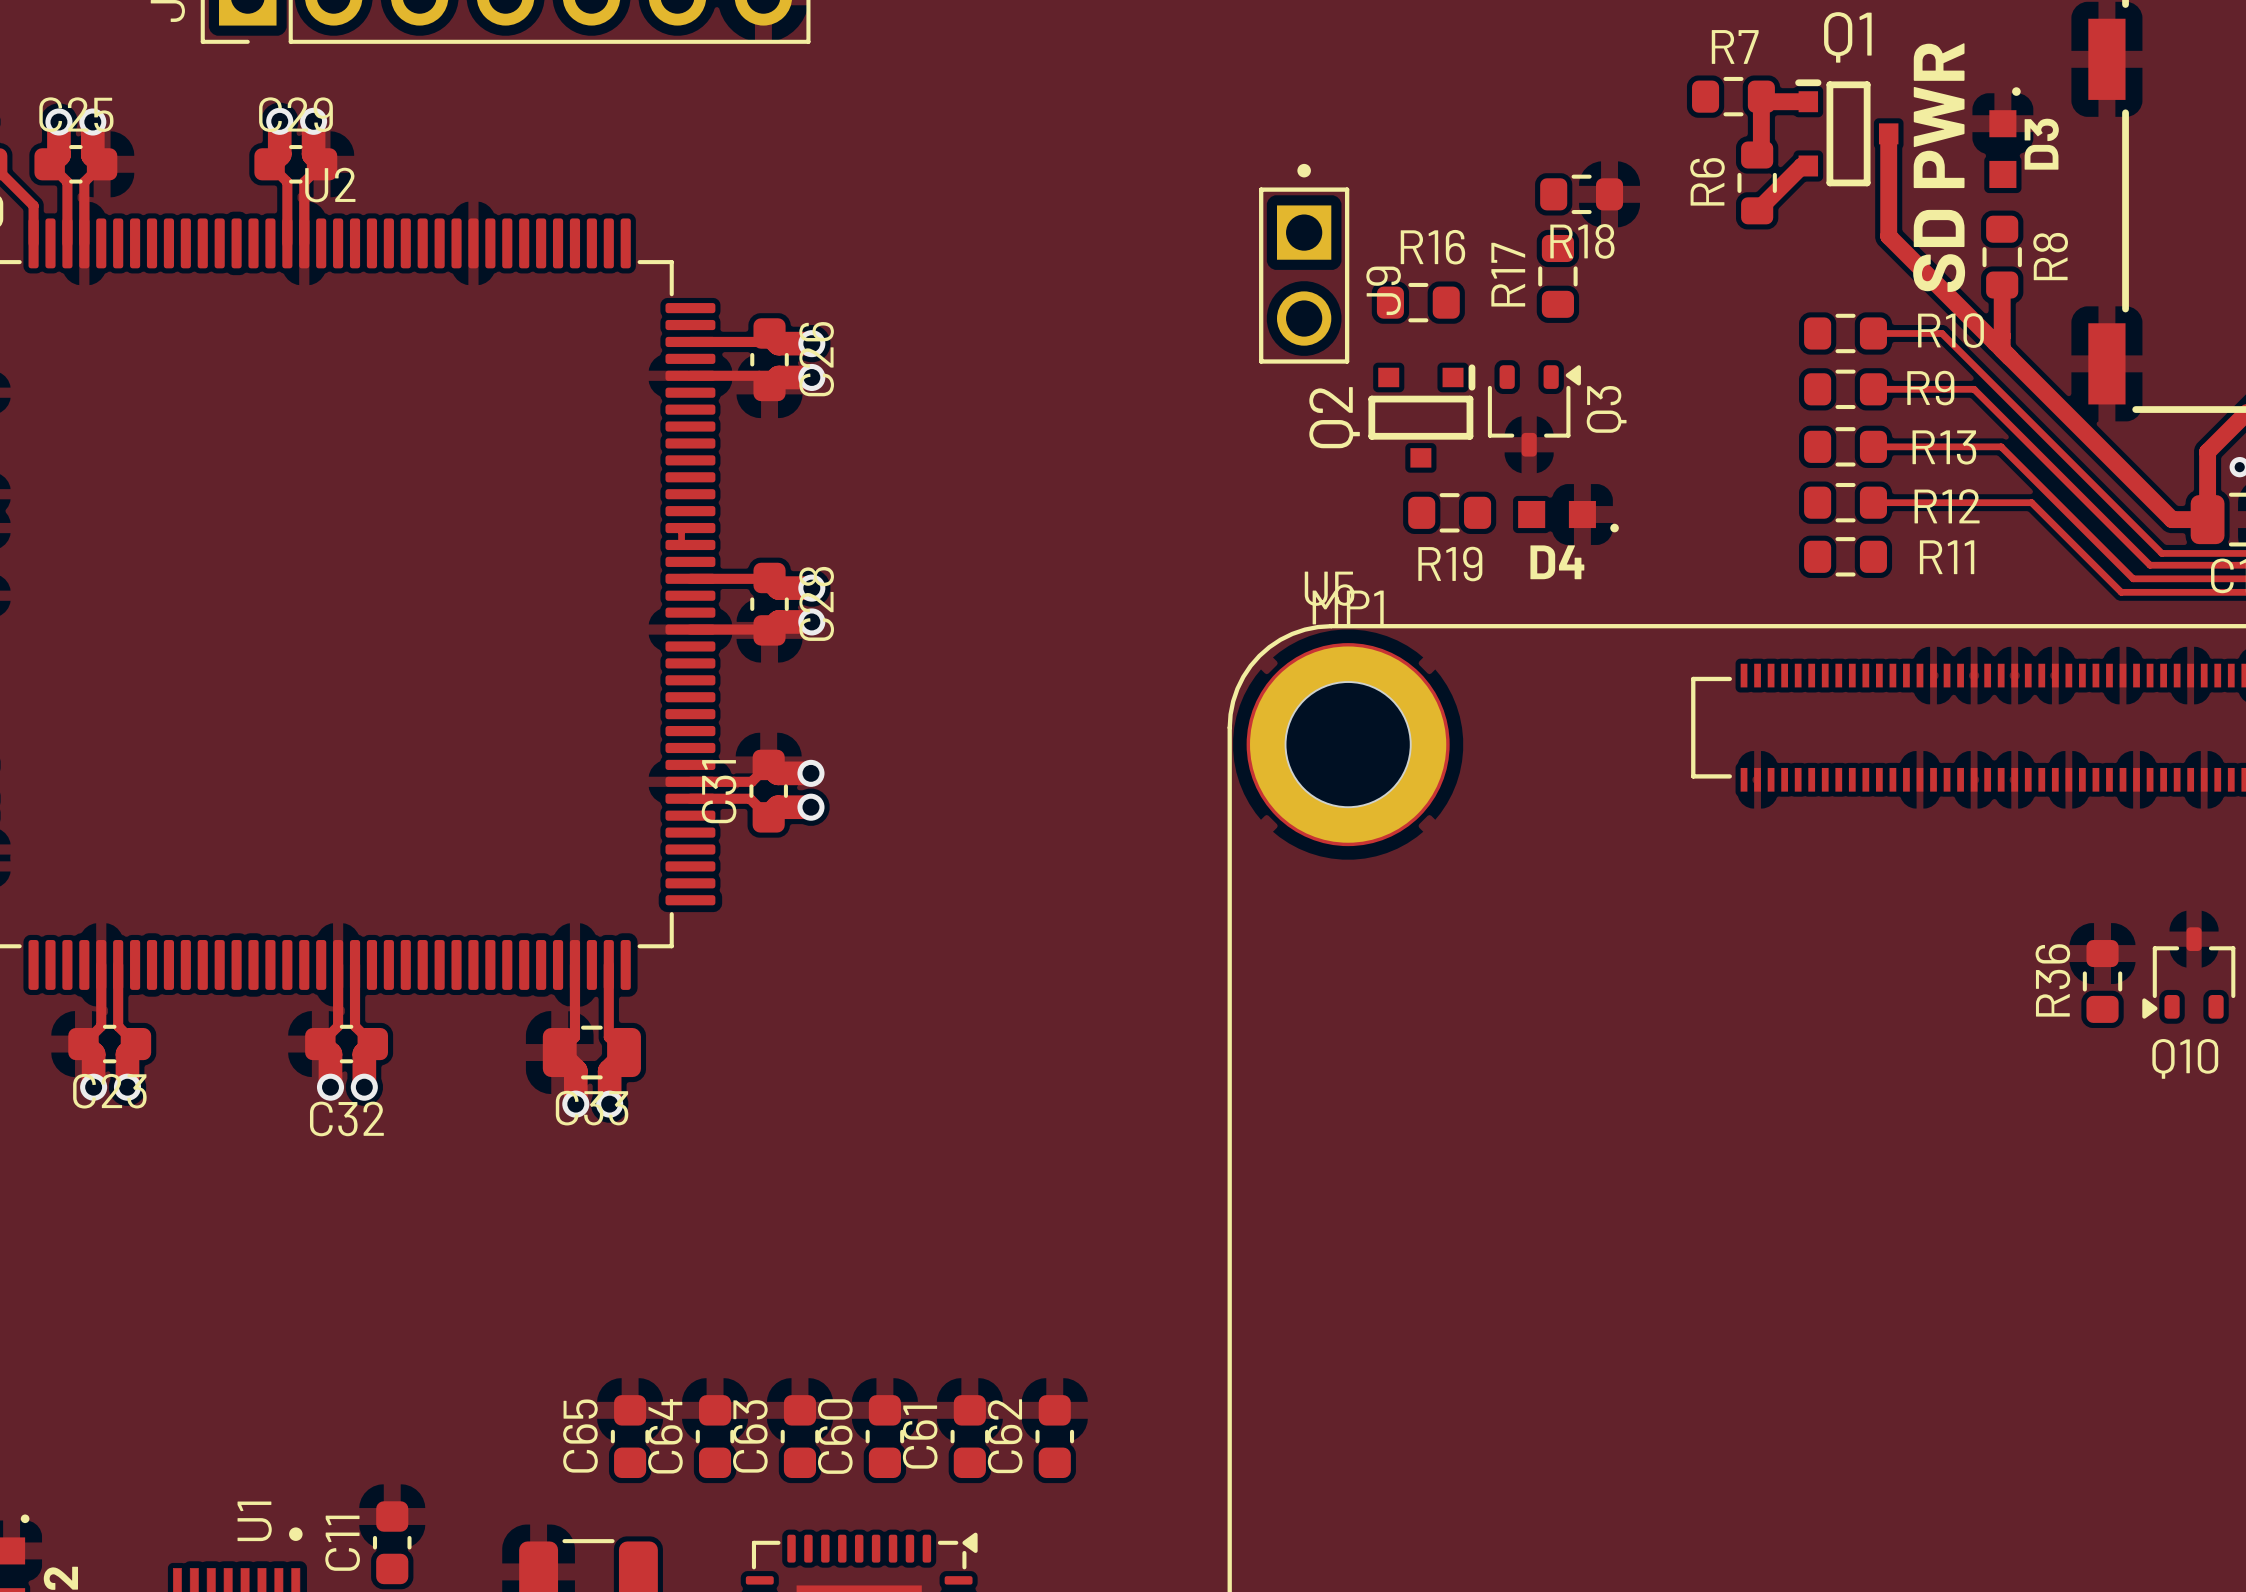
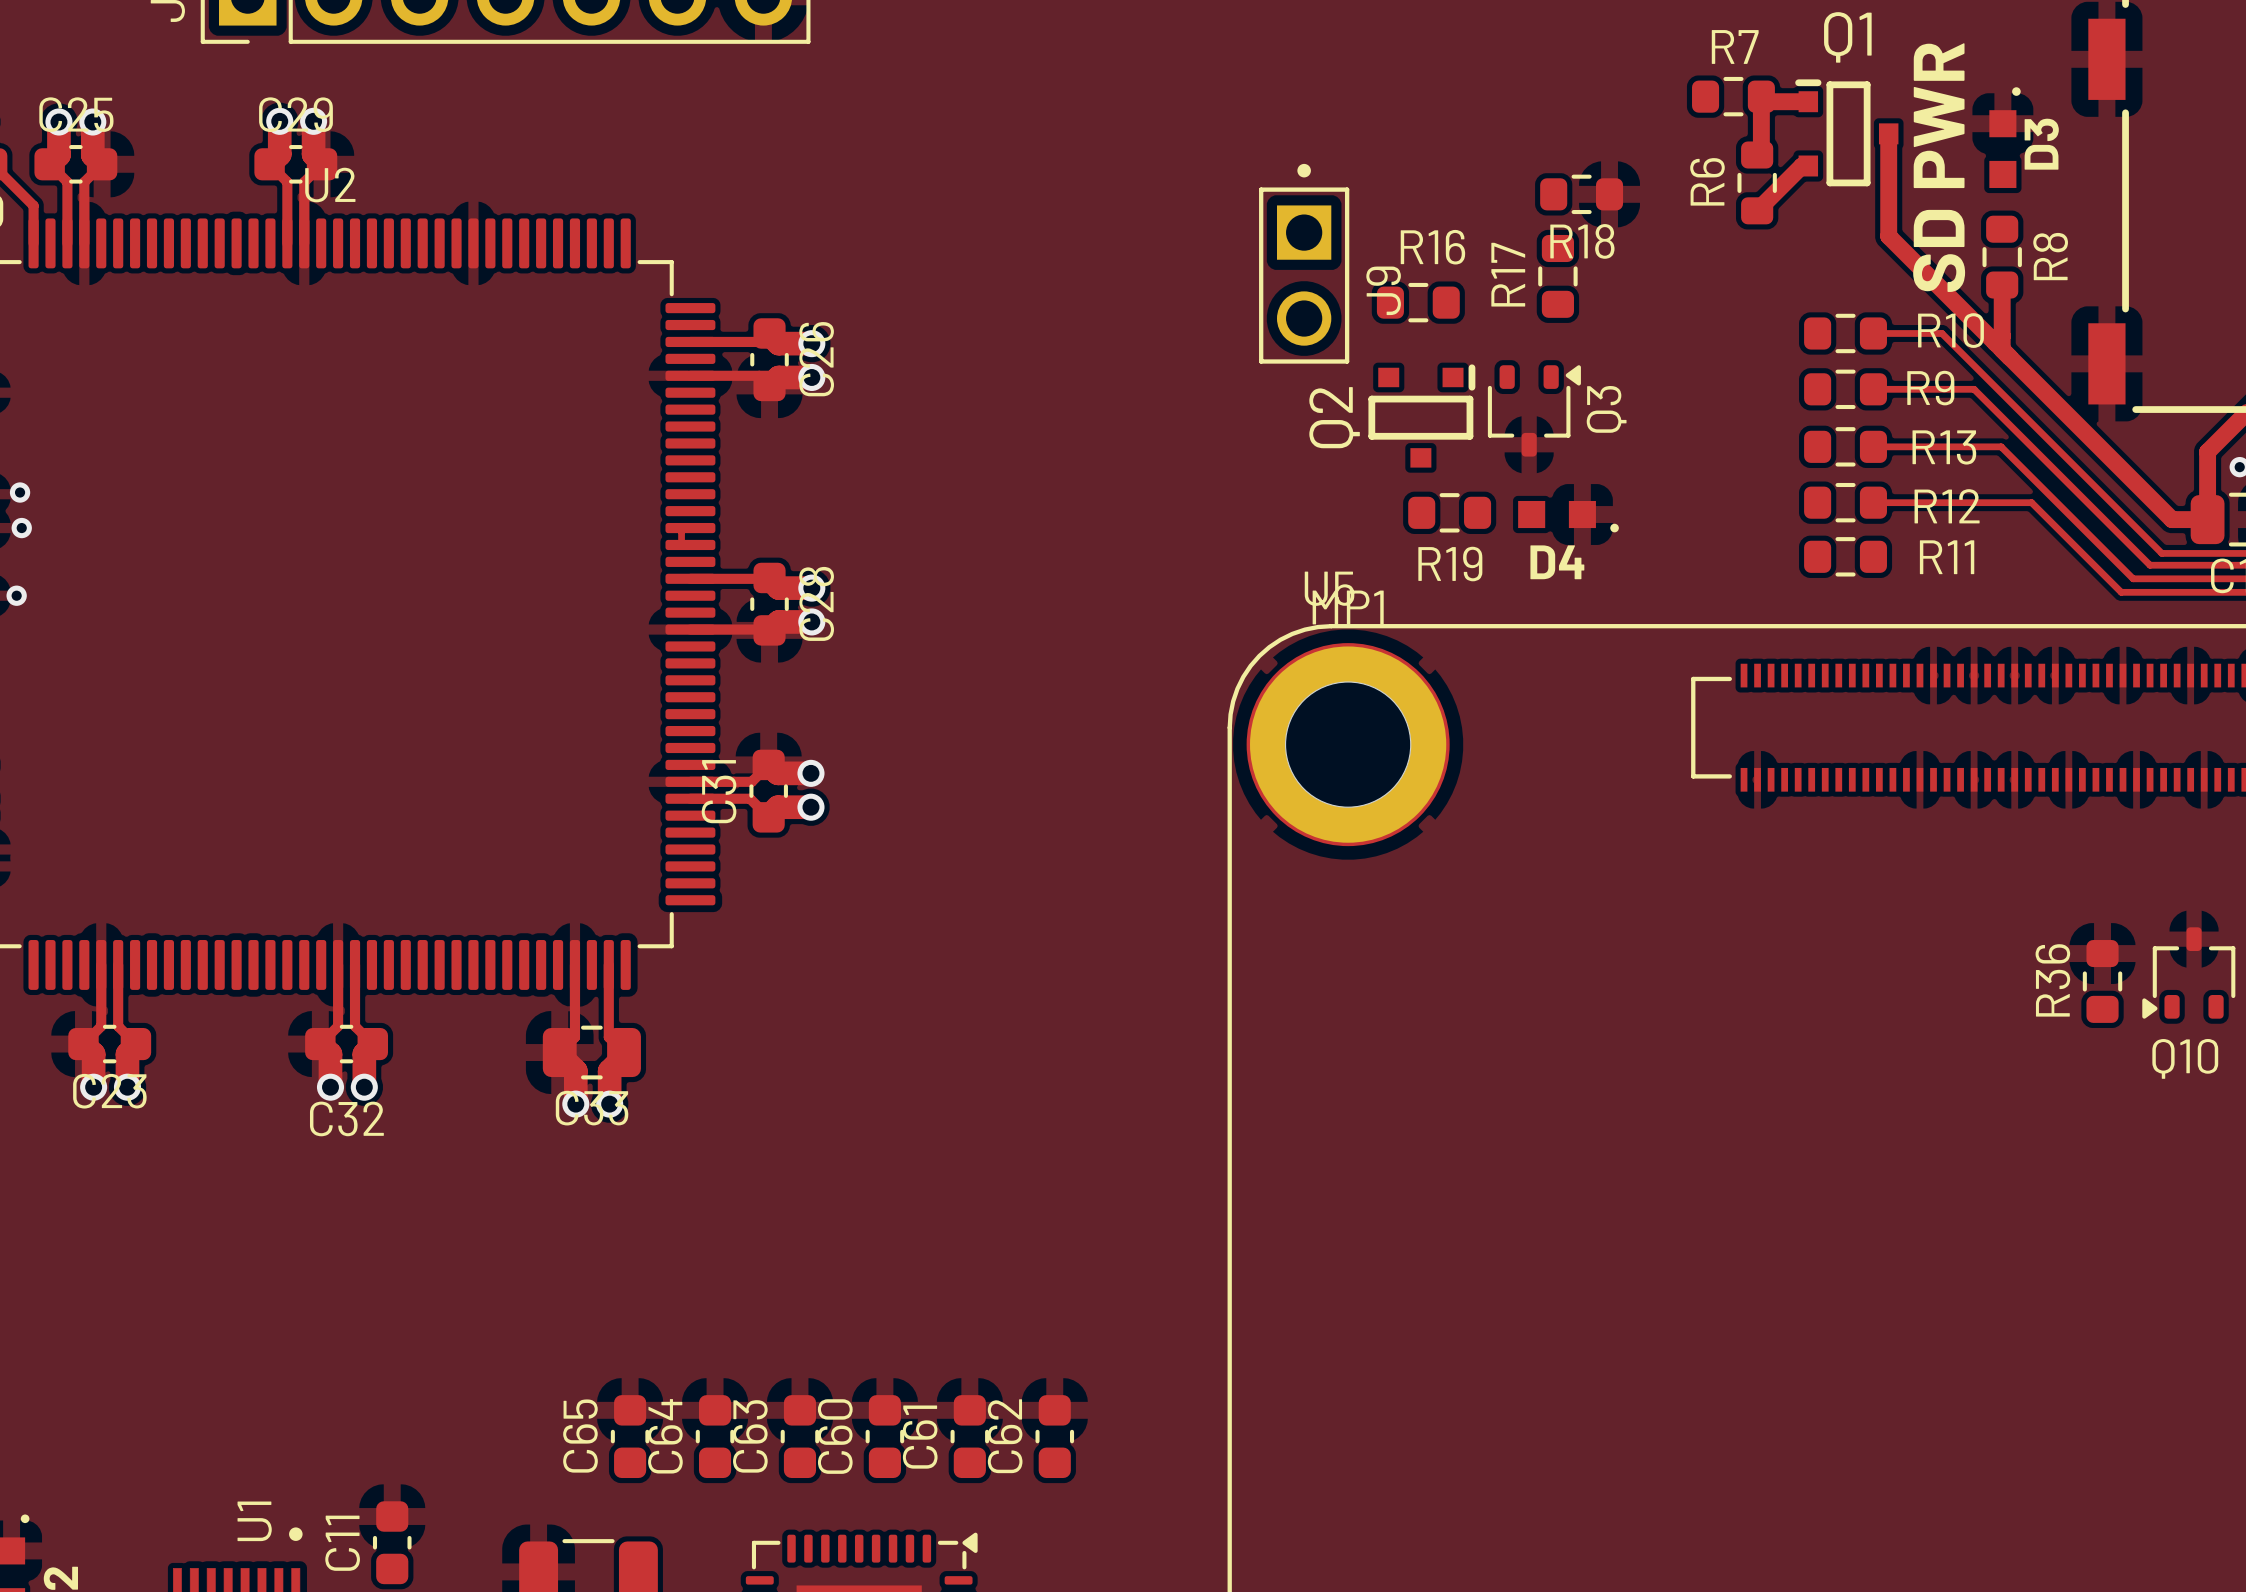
via: none -> (20, 492)
via: none -> (21, 528)
via: none -> (16, 595)

